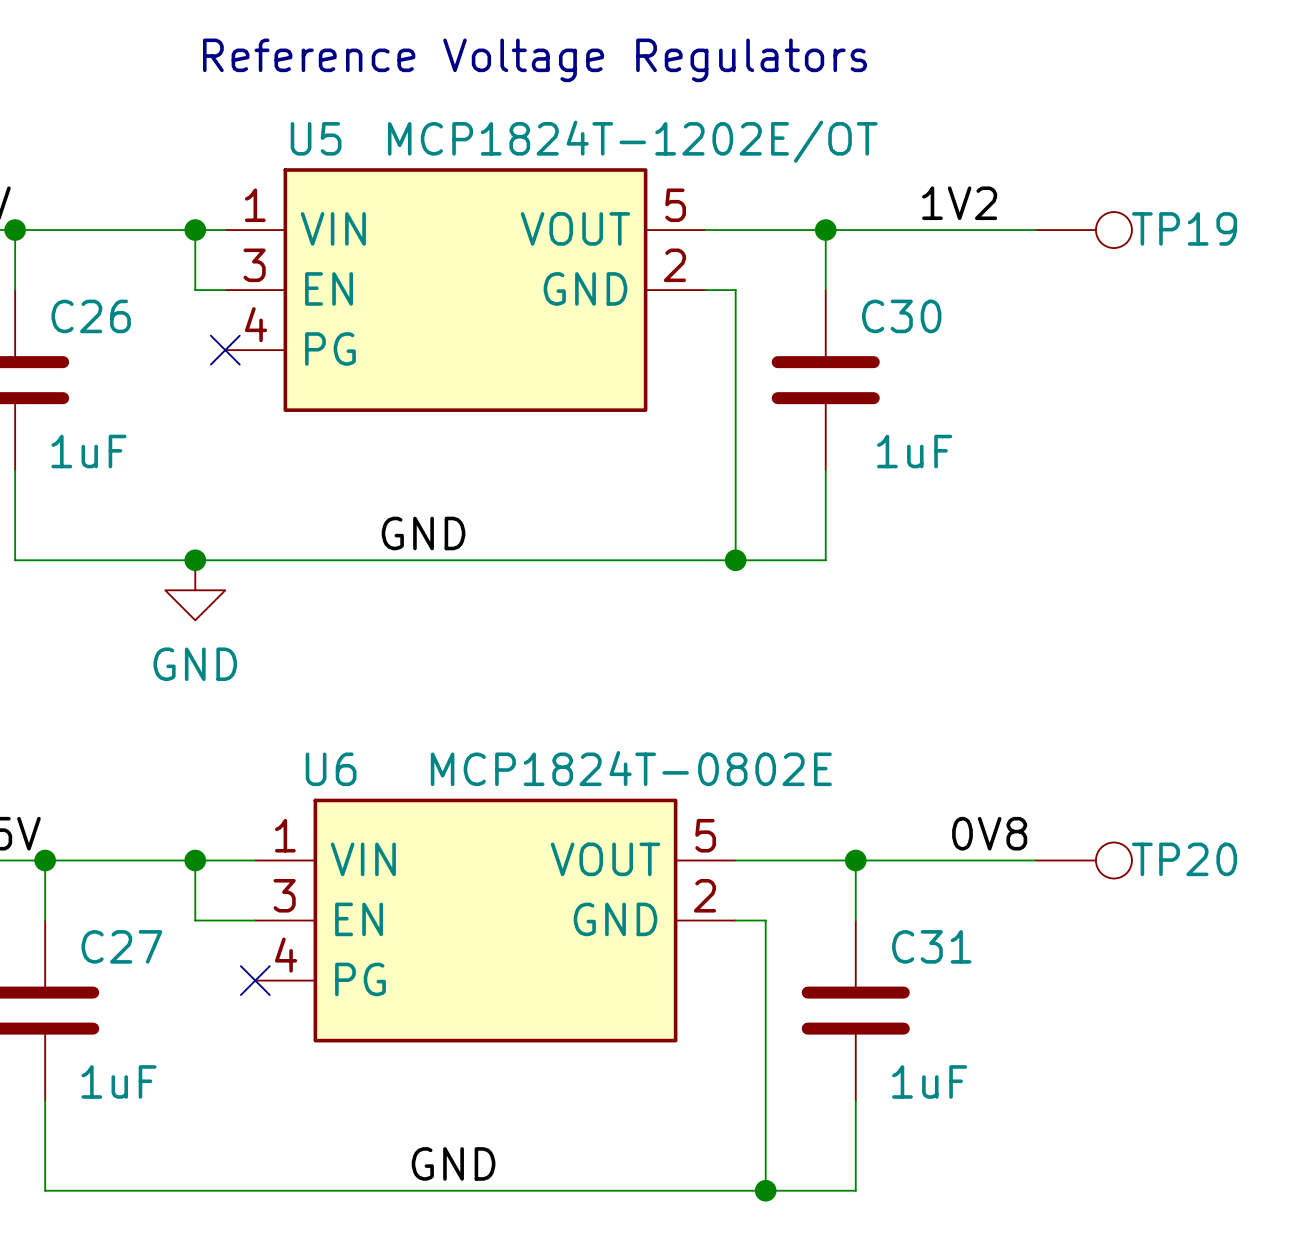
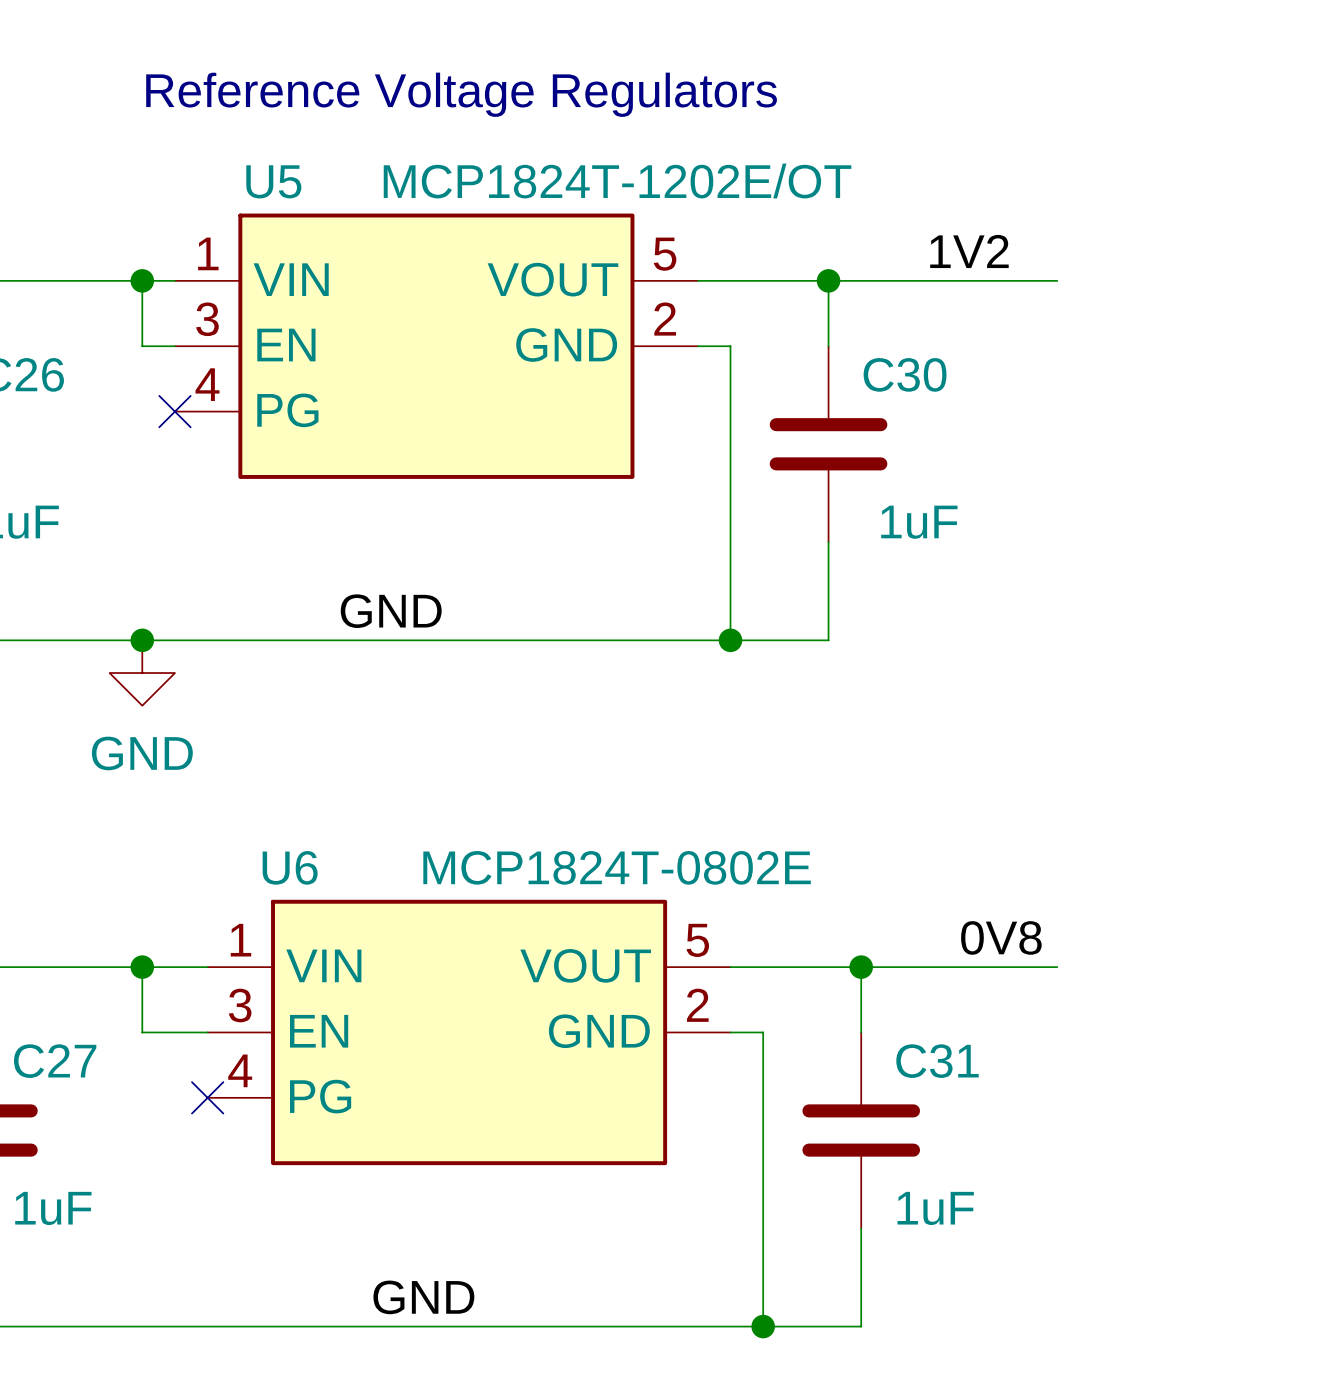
TP19: (1083, 230) -> none
TP20: (1083, 860) -> none

